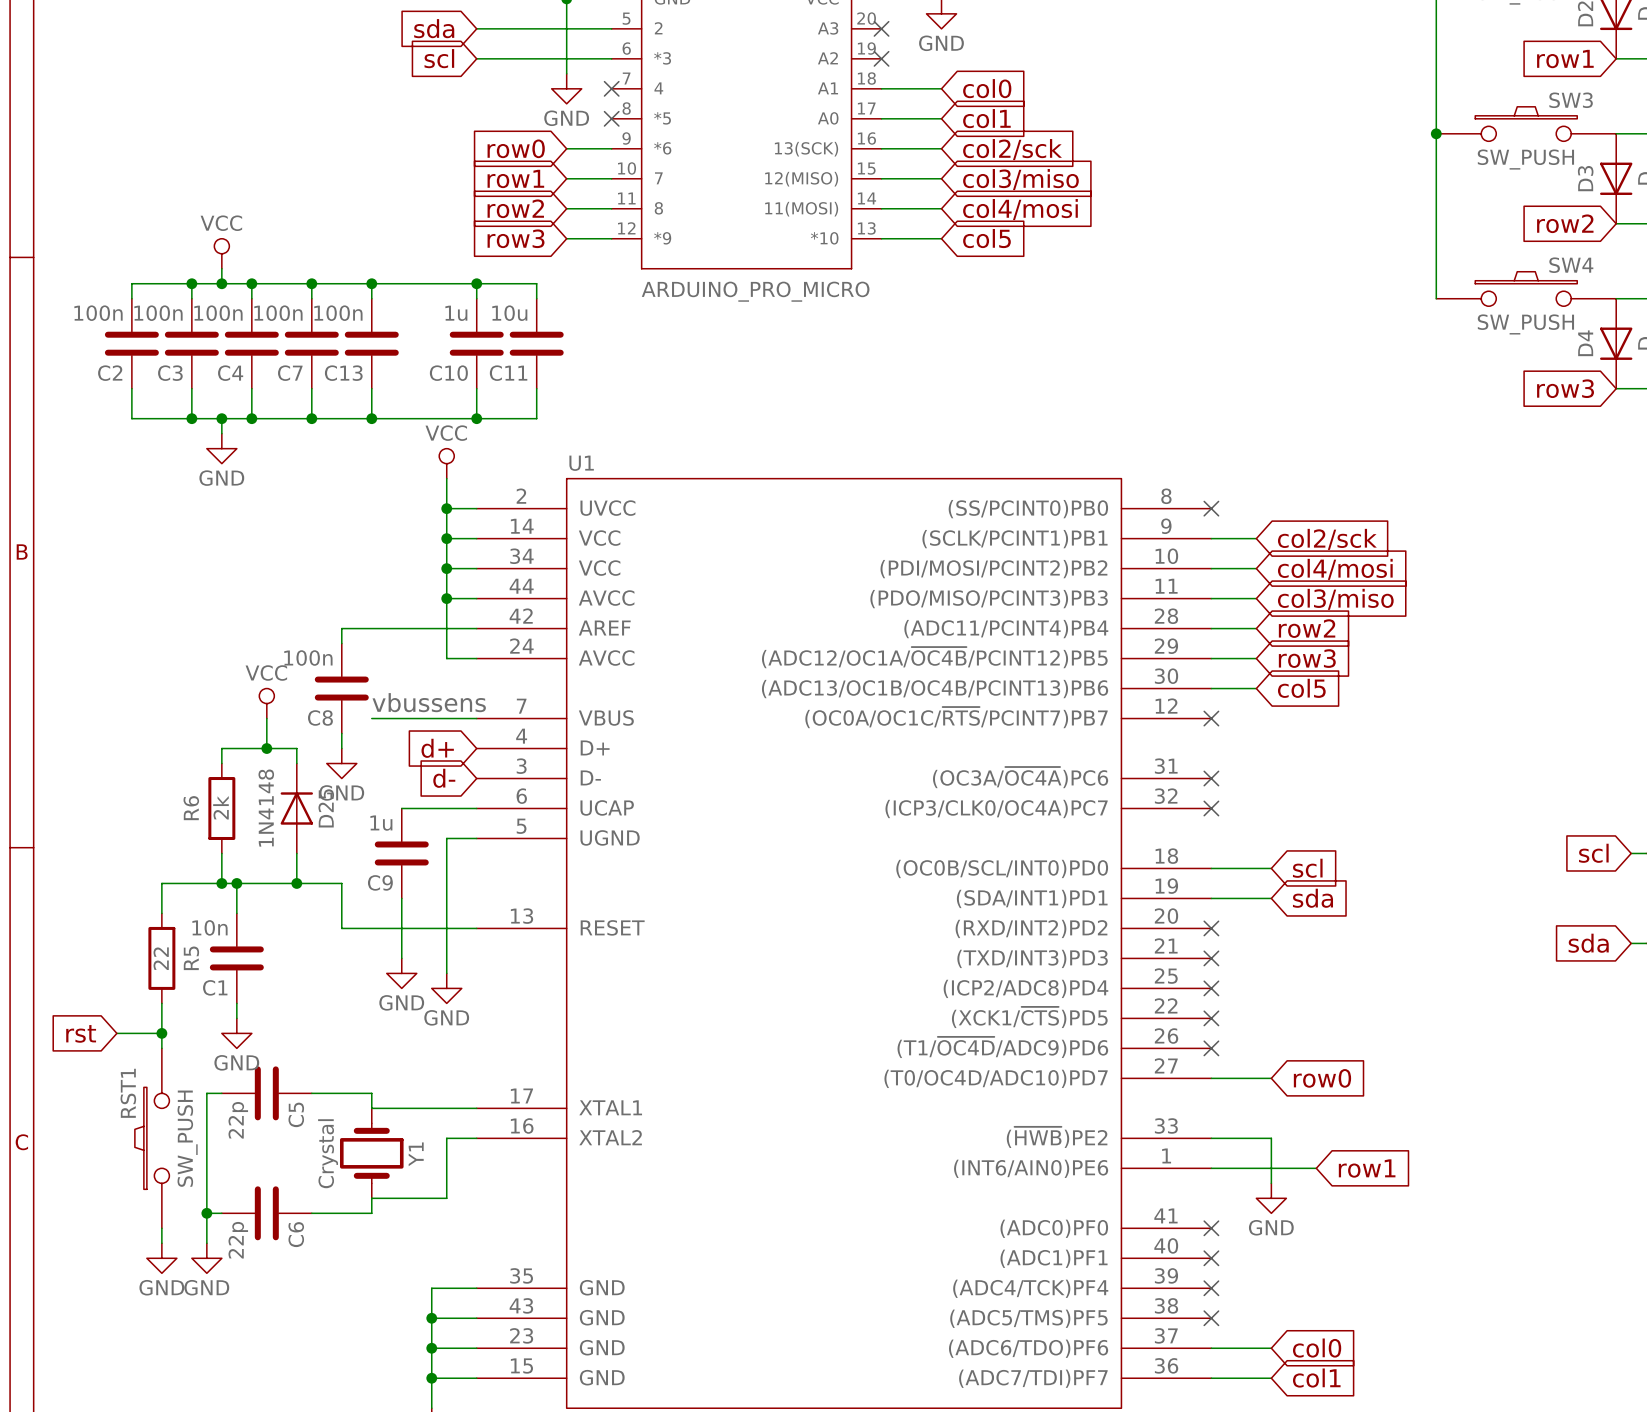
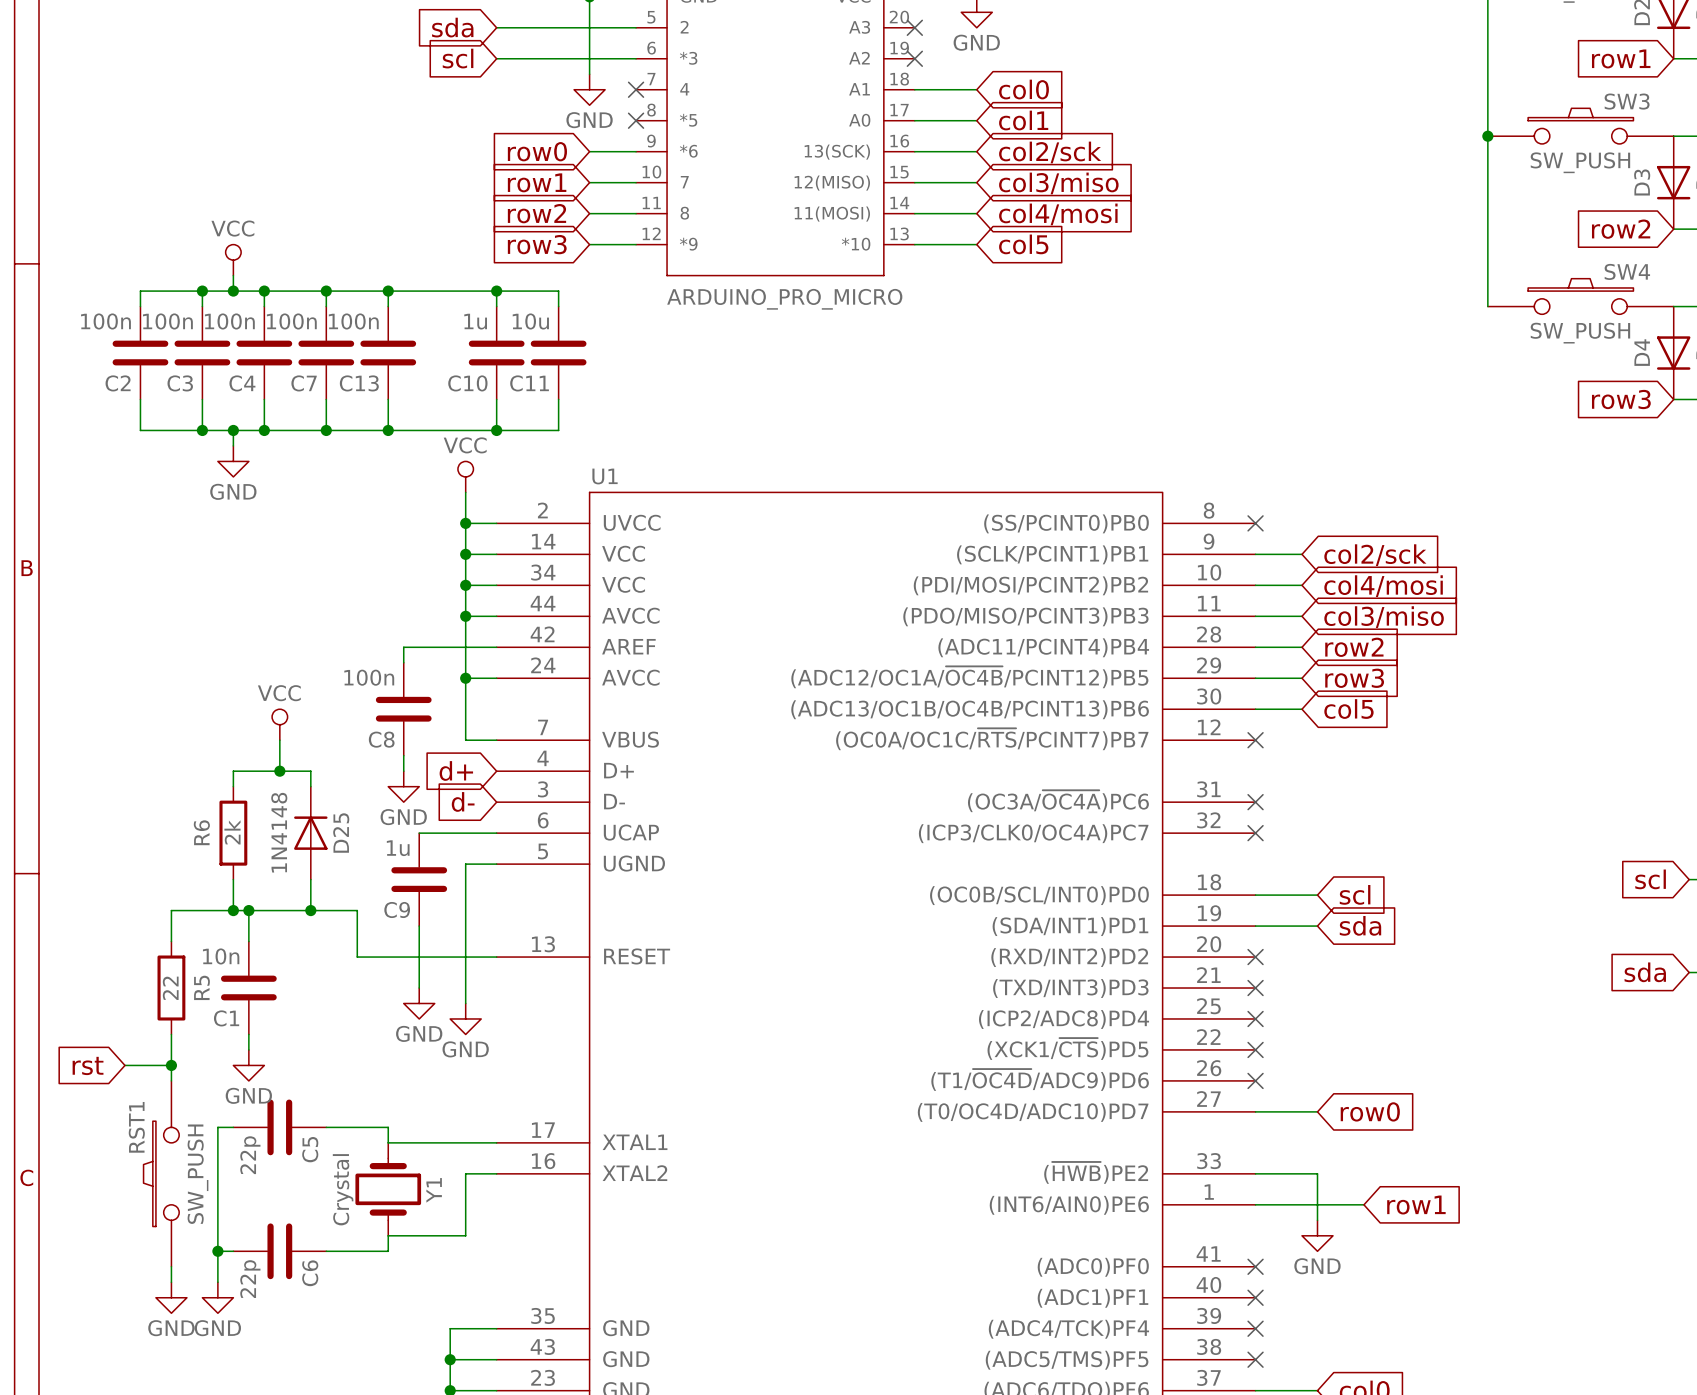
wire: (386, 628) (341, 628) (341, 643) -> (403, 647) (403, 662)
junction: none -> (465, 678)
C8 position: (341, 688) -> (403, 709)
label: vbussens (429, 702) -> none
wire: (371, 718) (446, 718) -> (465, 678) (465, 740)
wire: (341, 733) (341, 748) -> (403, 755) (403, 771)
power symbol position: GND (341, 763) -> GND (403, 786)

